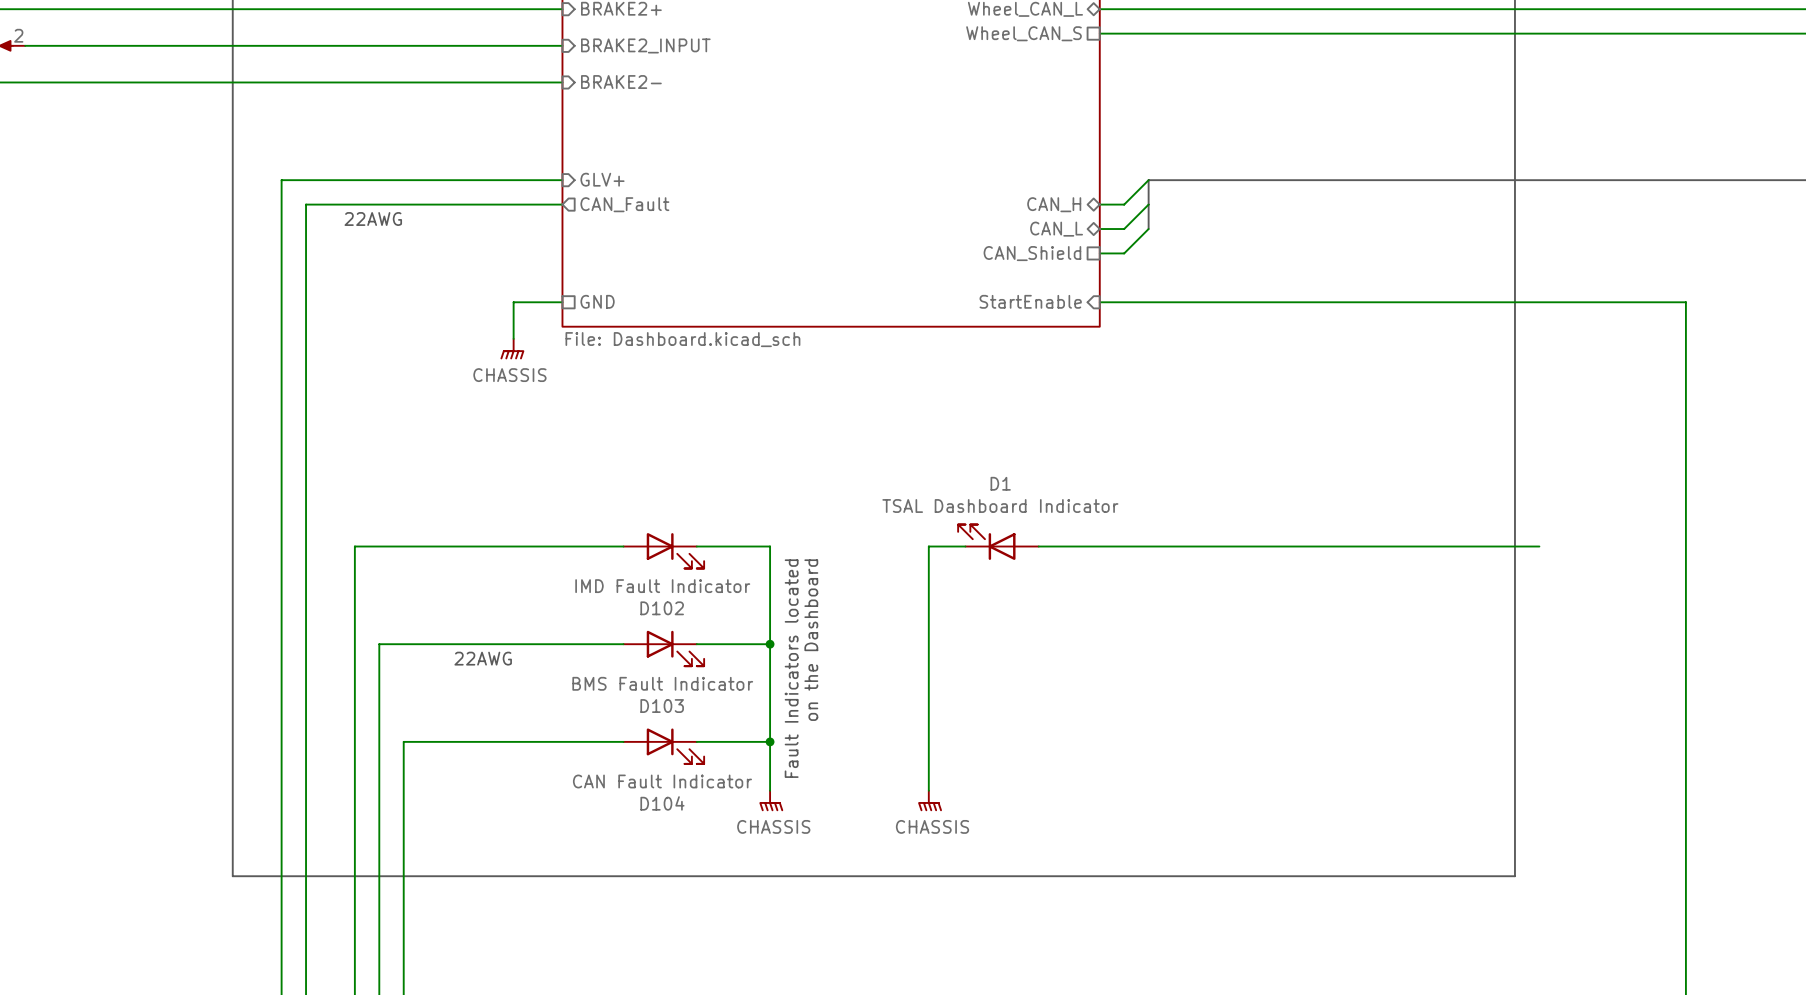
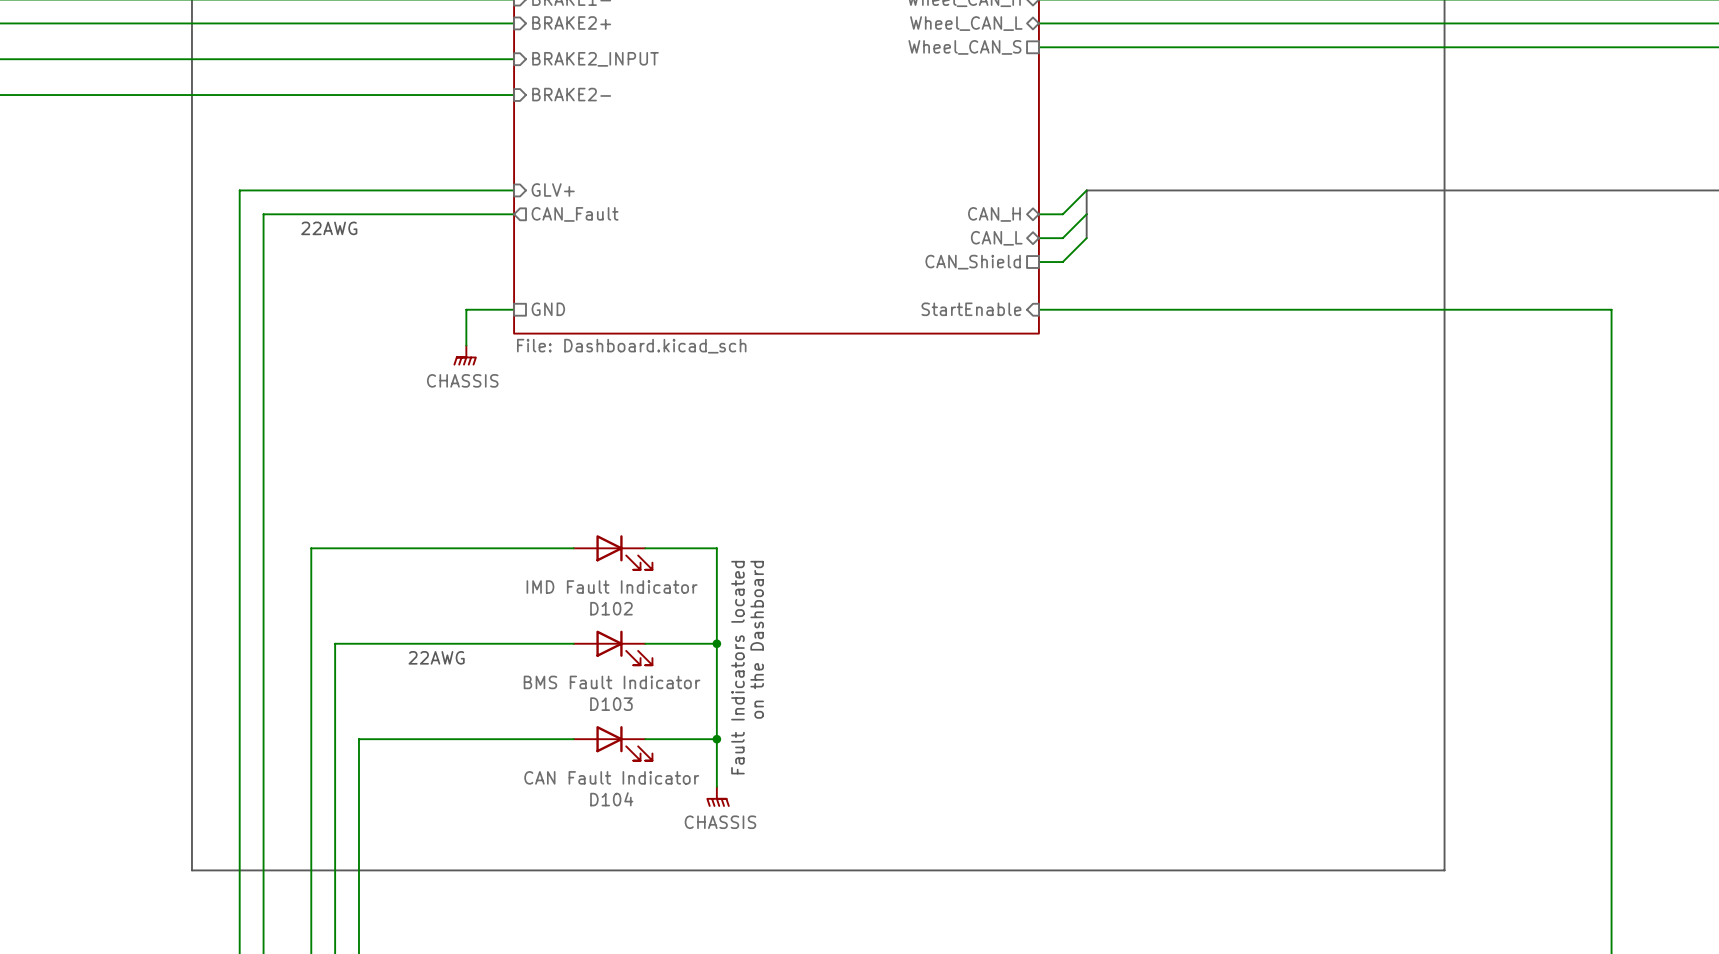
D1: TSAL Dashboard Indicator (998, 542) -> none
wire: (965, 546) (928, 546) (928, 790) -> none
wire: (1038, 546) (1539, 546) -> none
part: CHASSIS (930, 800) -> none

